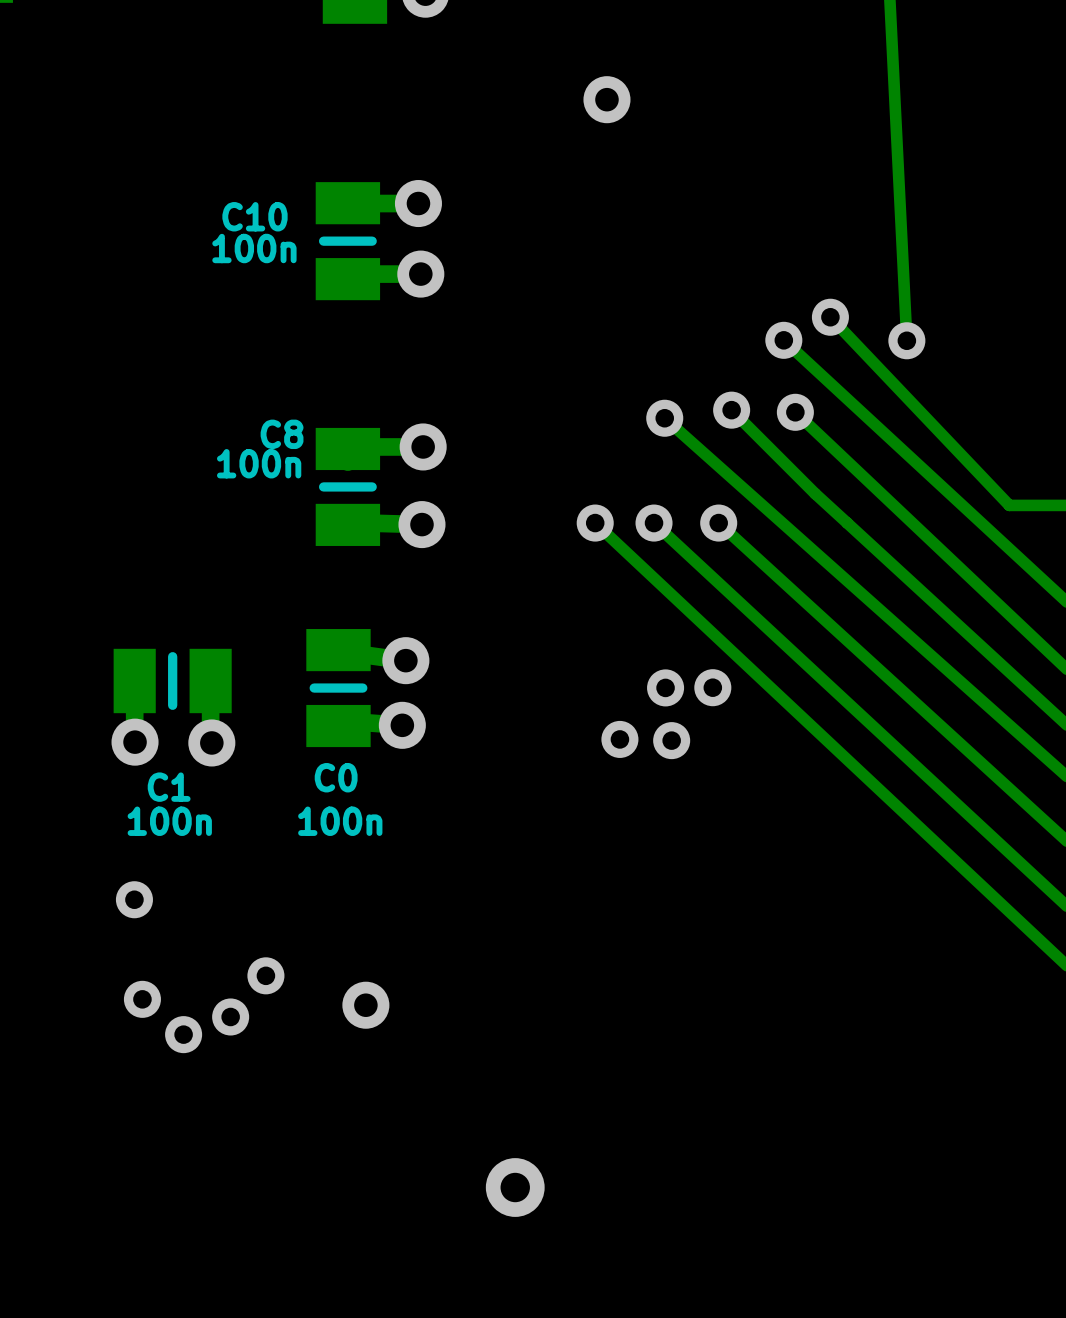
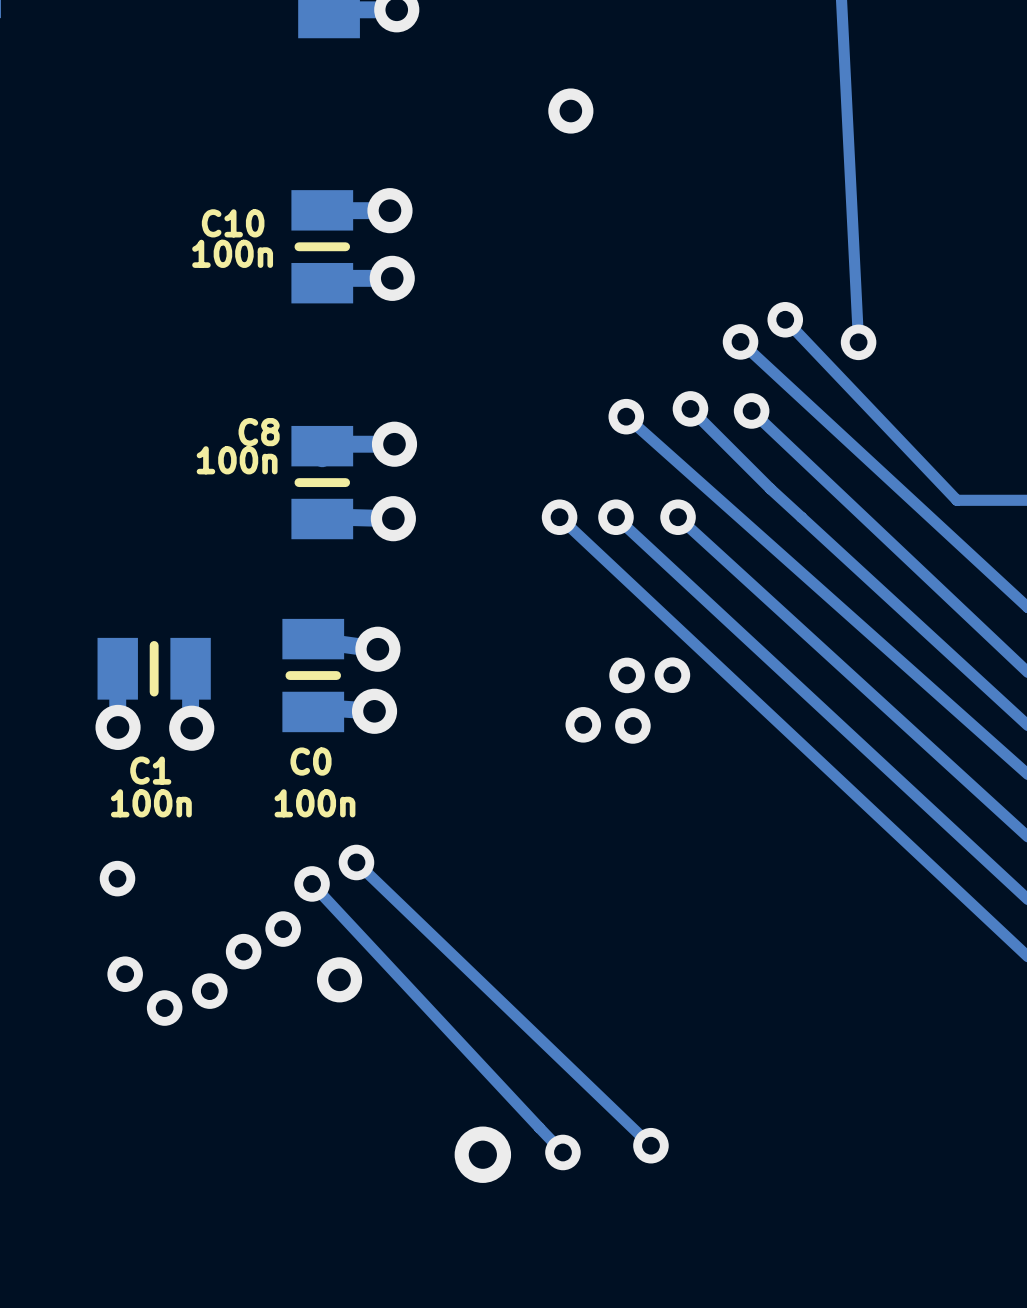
track: none -> (356, 862) (650, 1145)
via: none -> (356, 862)
track: none -> (312, 883) (562, 1152)
via: none -> (312, 883)
via: none -> (283, 929)
via: none -> (650, 1145)
via: none -> (562, 1152)

